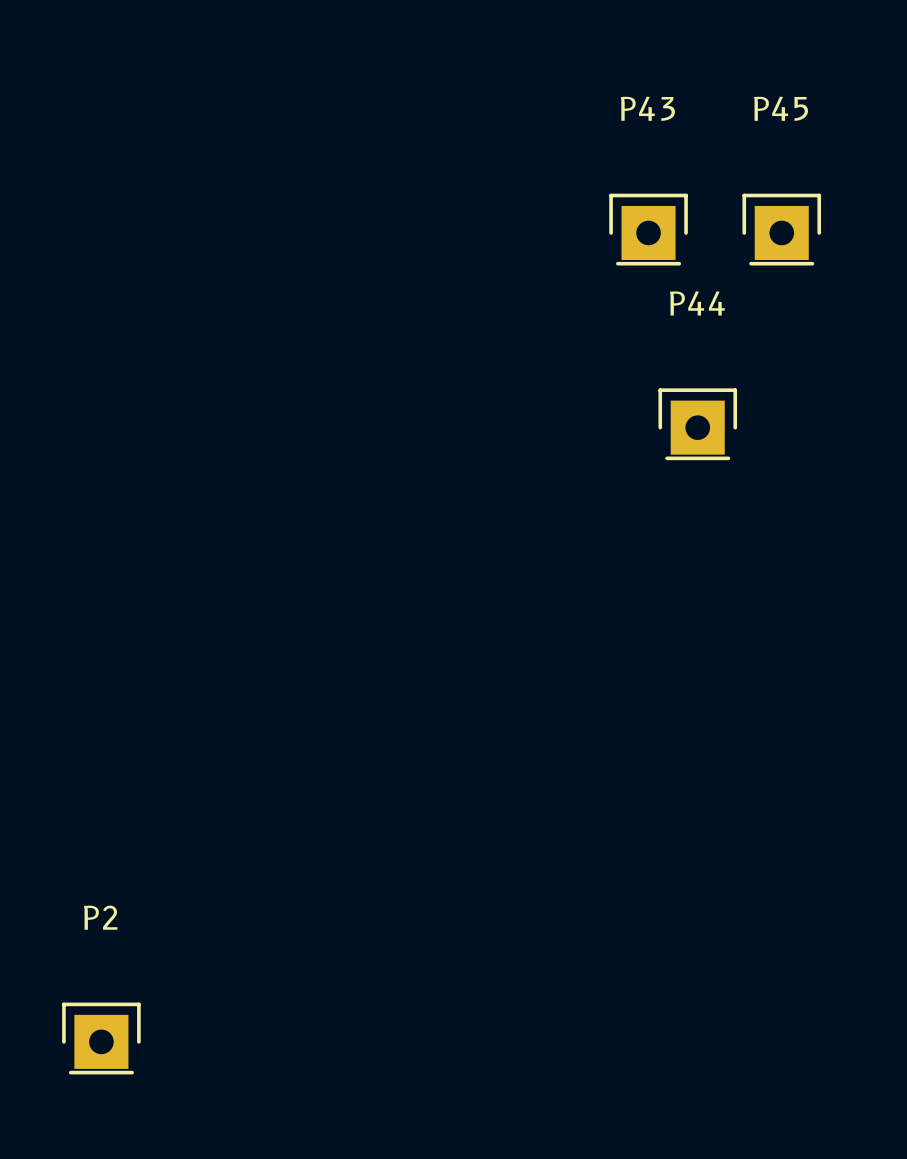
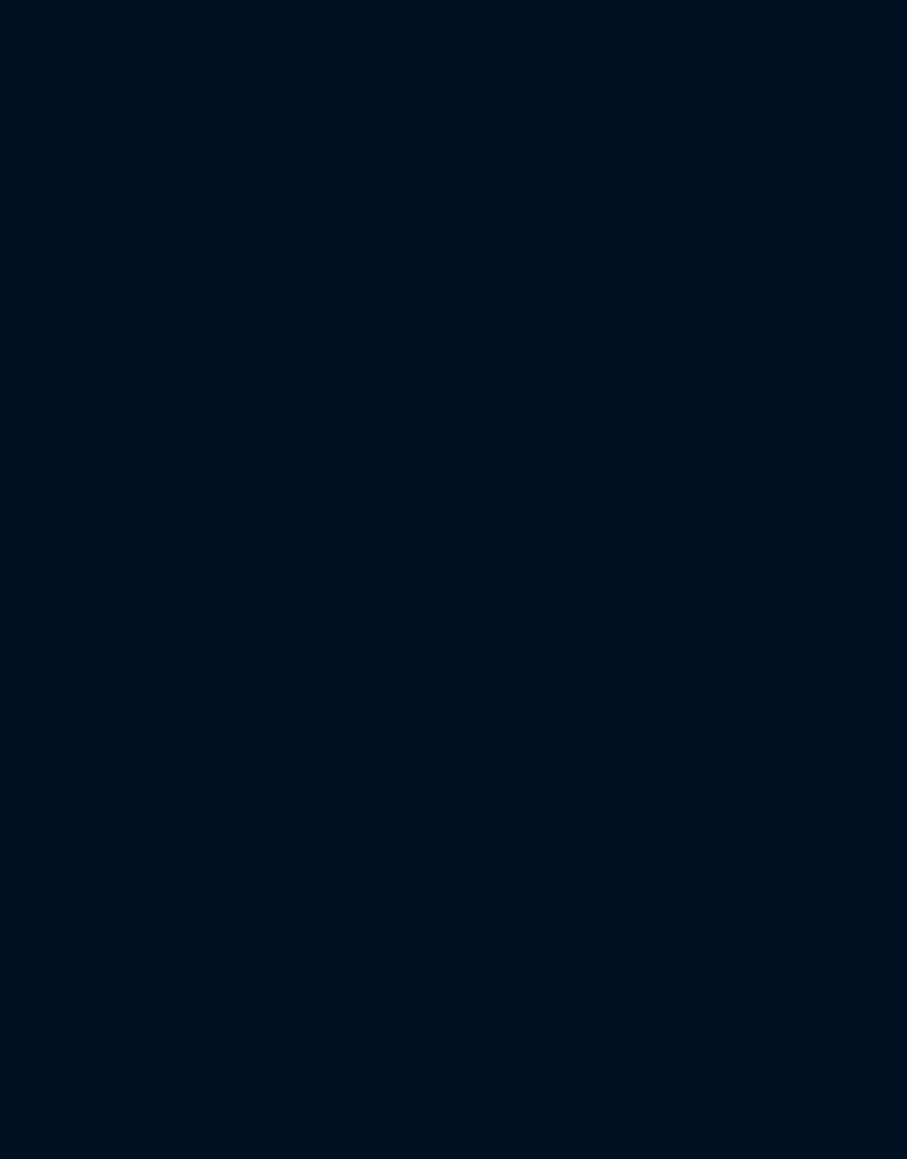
P43: (648, 229) -> none
P45: (781, 229) -> none
P44: (697, 424) -> none
P2: (101, 1038) -> none

